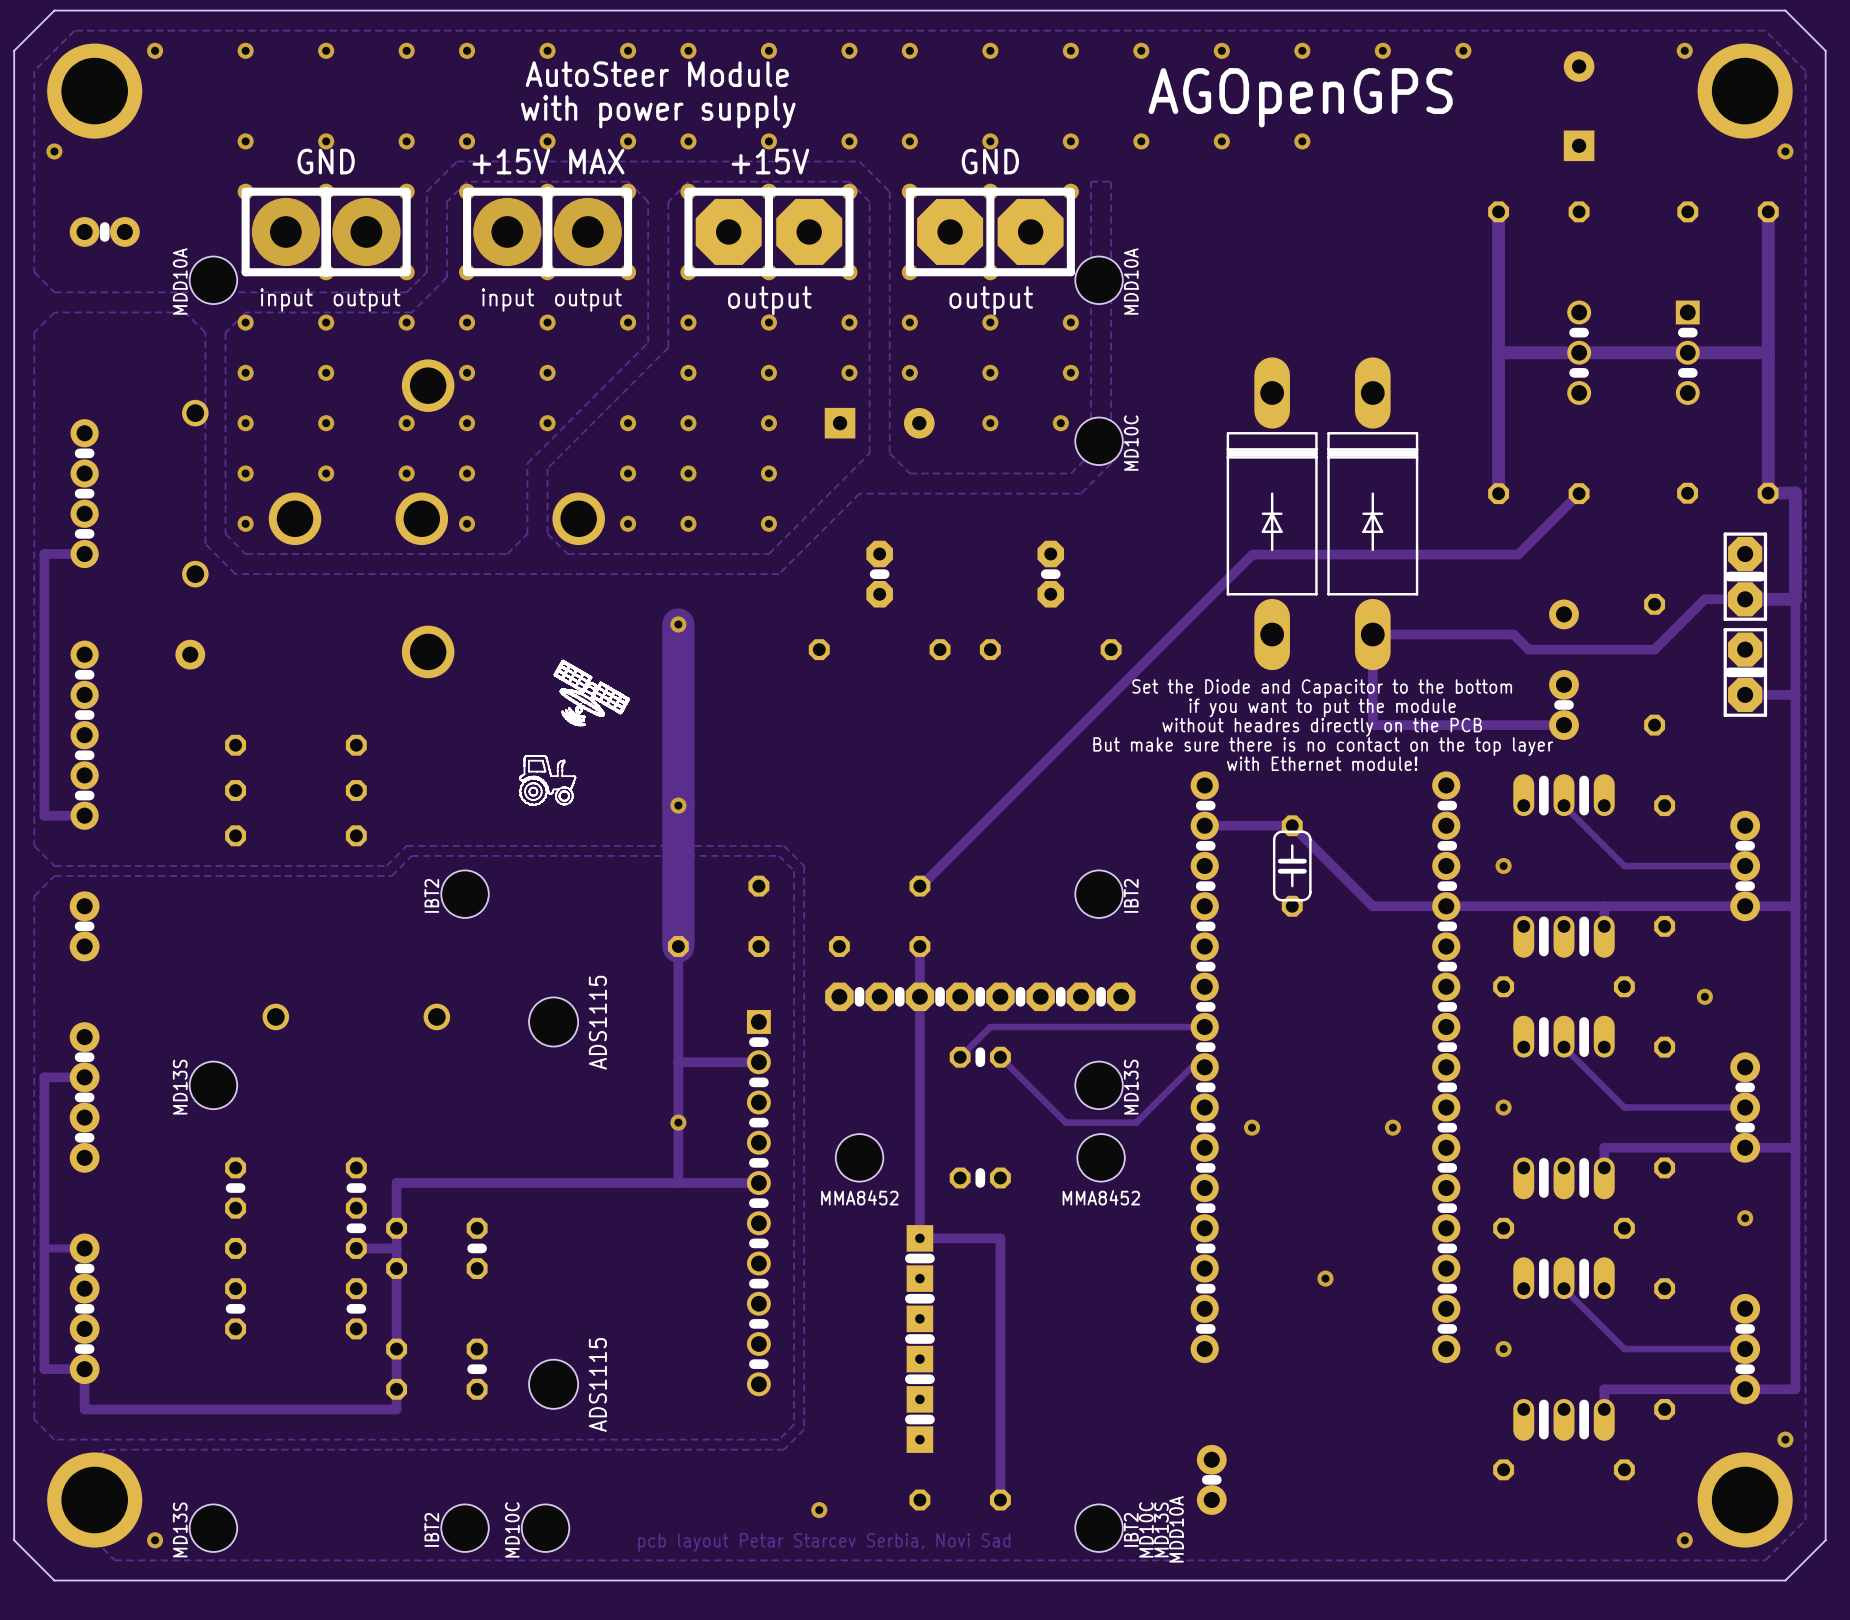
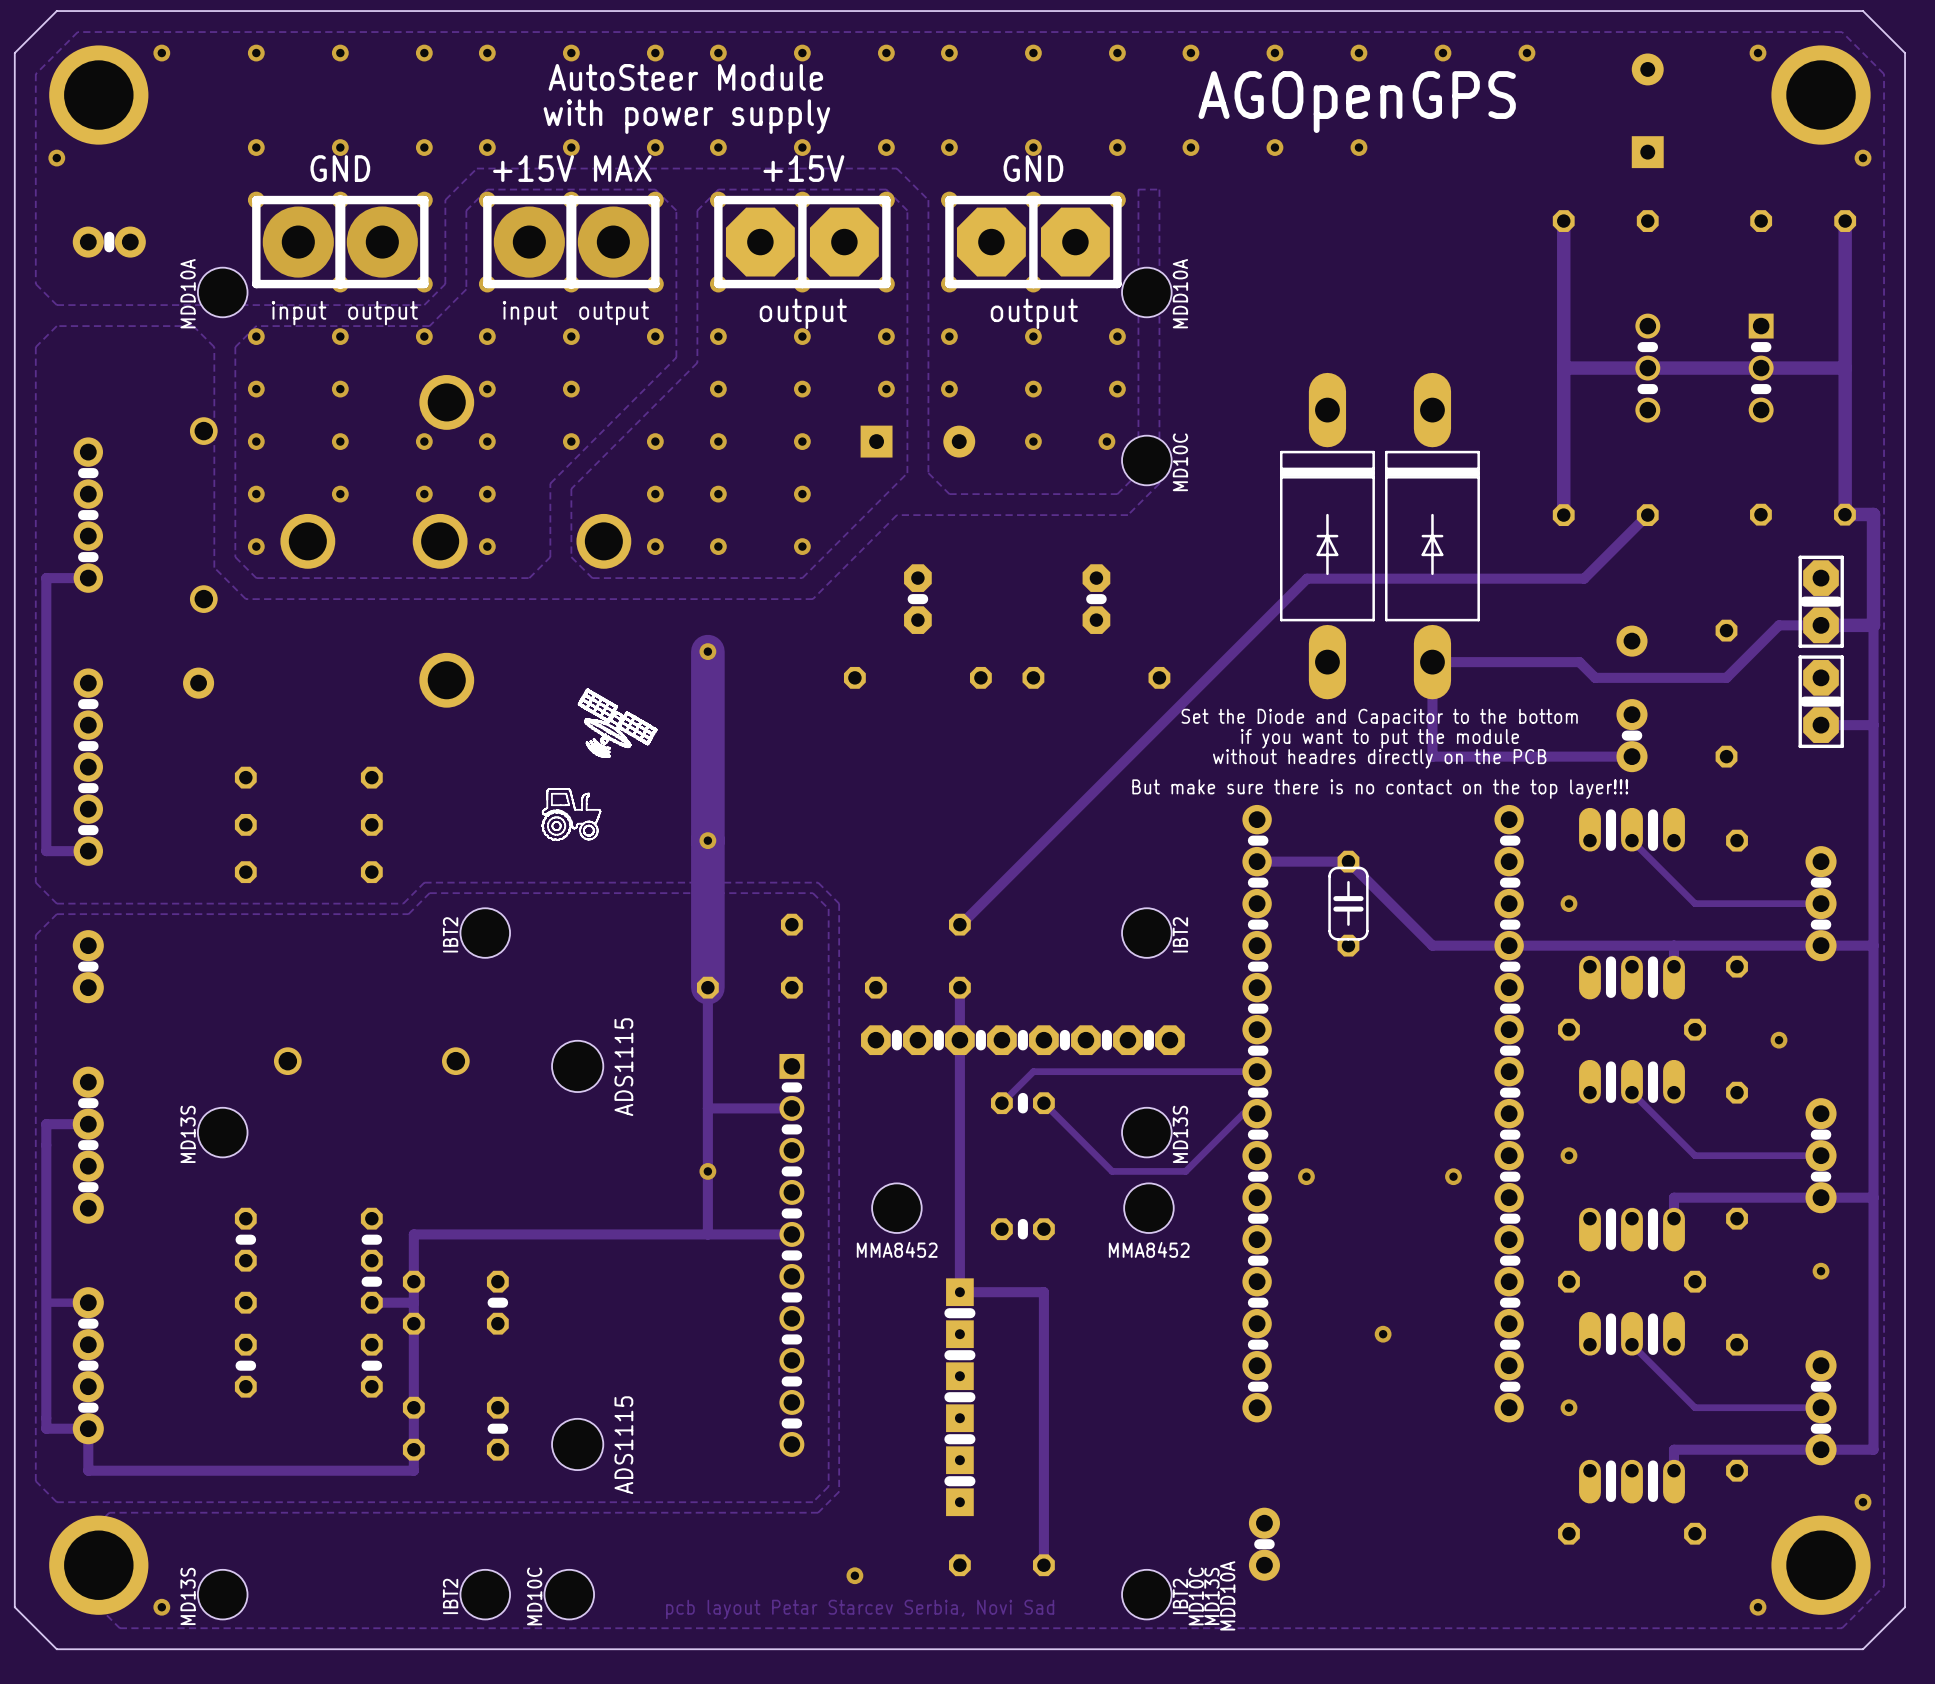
text: But make sure there is no contact on the top layer (1323, 746) -> But make sure there is no contact on the top layer!!! (1380, 789)
text: with Ethernet module! (1322, 763) -> none

